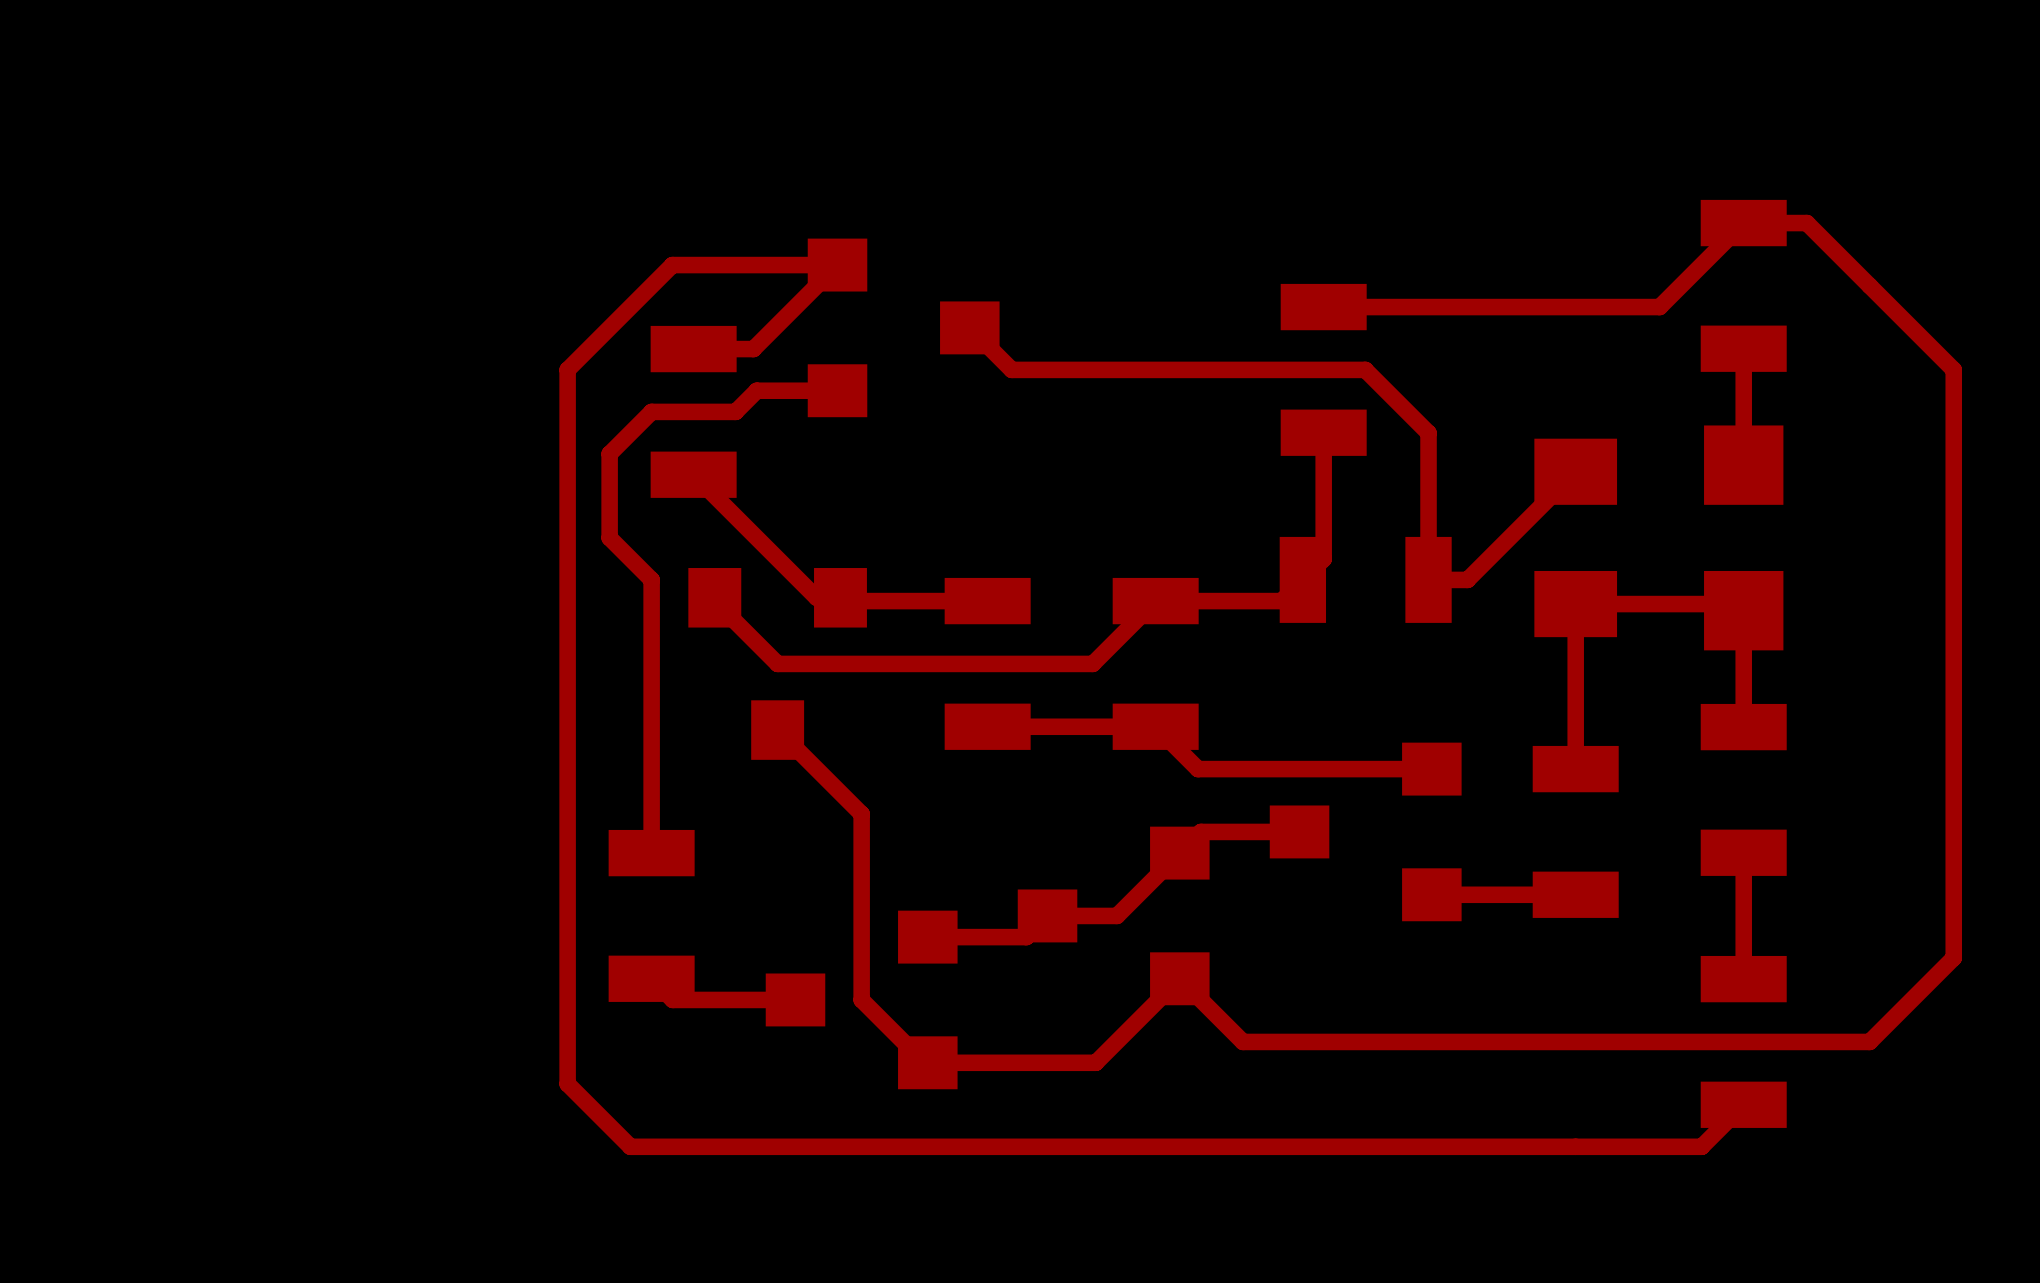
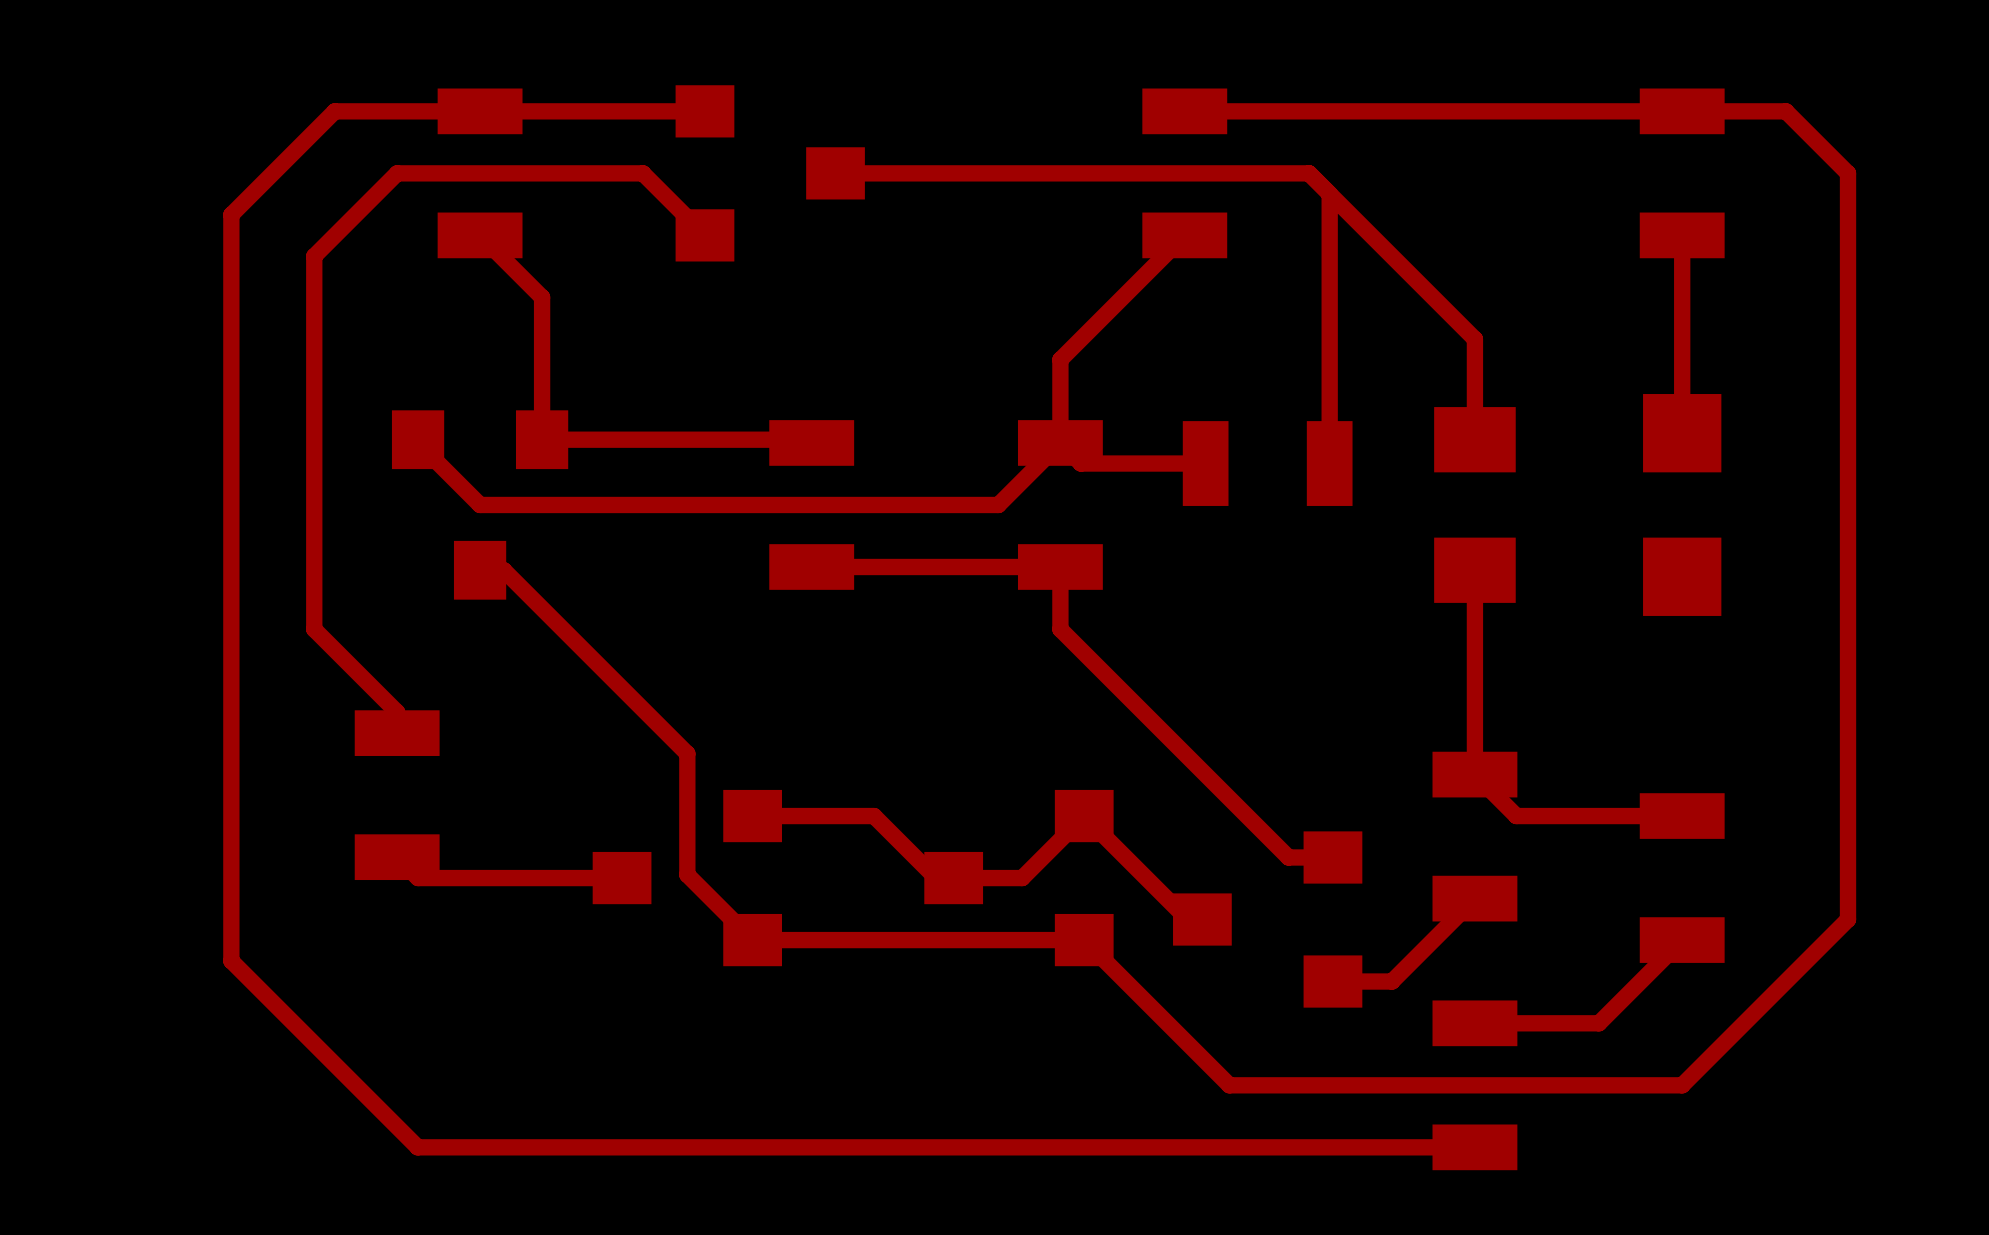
top track: none -> (704, 111) (334, 111) (231, 214) (231, 960) (417, 1147) (1474, 1147)
part: none -> (480, 173)
part: none -> (1184, 173)
top track: none -> (480, 235) (542, 297) (542, 439) (808, 439) (811, 442)
top track: none -> (704, 235) (642, 173) (397, 173) (314, 256) (314, 629) (397, 712) (397, 733)
top track: none -> (1184, 235) (1060, 359) (1060, 442)
top track: none -> (1682, 235) (1682, 433)
part position: (1743, 285) -> (1682, 173)
top track: (1323, 307) (1659, 307) (1743, 223) (1806, 223) (1953, 369) -> (1184, 111) (1785, 111) (1848, 173) (1848, 339)
part position: (903, 327) -> (770, 173)
top track: (969, 327) (1011, 369) (1365, 369) (1428, 433) -> (1329, 193) (1329, 401)
top track: (1743, 348) (1743, 465) -> none
top track: (693, 349) (753, 349) (837, 265) (672, 265) (567, 369) (567, 1083) (630, 1146) (1701, 1146) (1743, 1104) -> none
part: (1323, 369) -> none
top track: (837, 390) (756, 390) (735, 411) (651, 411) (609, 453) (609, 537) (651, 579) (651, 853) -> none
part: (693, 411) -> none
top track: (1323, 432) (1323, 559) (1281, 601) (1155, 601) (1092, 663) (777, 663) (714, 601) (714, 597) -> none
top track: none -> (418, 439) (418, 442) (480, 504) (998, 504) (1060, 442)
top track: (1575, 471) (1467, 579) (1428, 579) (1428, 495) -> (1474, 439) (1474, 339) (1309, 173) (835, 173)
top track: (693, 474) (816, 597) (840, 597) (843, 601) (987, 601) -> none
top track: none -> (1060, 442) (1080, 463) (1205, 463)
part: none -> (1267, 463)
part: none -> (480, 504)
part: none -> (811, 504)
part: none -> (1060, 504)
part position: (1743, 537) -> (1682, 504)
part: (1365, 579) -> none
top track: (1582, 604) (1737, 604) (1743, 610) (1743, 727) -> none
part: (777, 663) -> none
part: (987, 663) -> none
part: (1155, 663) -> none
top track: (987, 726) (1155, 726) (1198, 769) (1431, 769) -> none
top track: (777, 730) (861, 814) (861, 999) (924, 1062) (1095, 1062) (1179, 978) -> (480, 570) (503, 570) (687, 753) (687, 874) (752, 940) (1084, 940)
top track: none -> (1474, 733) (1474, 774) (1516, 816) (1682, 816)
part: (1743, 789) -> none
top track: (1299, 831) (1200, 831) (1179, 853) -> (1202, 919) (1187, 919) (1084, 816)
part position: (1365, 831) -> (1267, 919)
part position: (1575, 831) -> (1474, 836)
top track: none -> (752, 801) (752, 816) (874, 816) (936, 878)
top track: (1743, 852) (1743, 979) -> none
top track: none -> (397, 857) (418, 878) (622, 878)
top track: (1575, 894) (1431, 894) -> (811, 567) (1060, 567) (1060, 629) (1288, 857) (1332, 857)
part position: (651, 915) -> (397, 795)
top track: (1047, 915) (1026, 937) (927, 937) -> none
part: none -> (1682, 878)
top track: none -> (1474, 898) (1392, 981) (1332, 981)
top track: (651, 978) (672, 999) (795, 999) -> none
top track: none -> (1682, 940) (1598, 1023) (1474, 1023)
part position: (861, 999) -> (687, 878)
part: (1743, 1041) -> none
top track: (1869, 1041) (1242, 1041) -> (1765, 1002) (1682, 1085) (1229, 1085) (1146, 1002)
part: none -> (1474, 1085)

